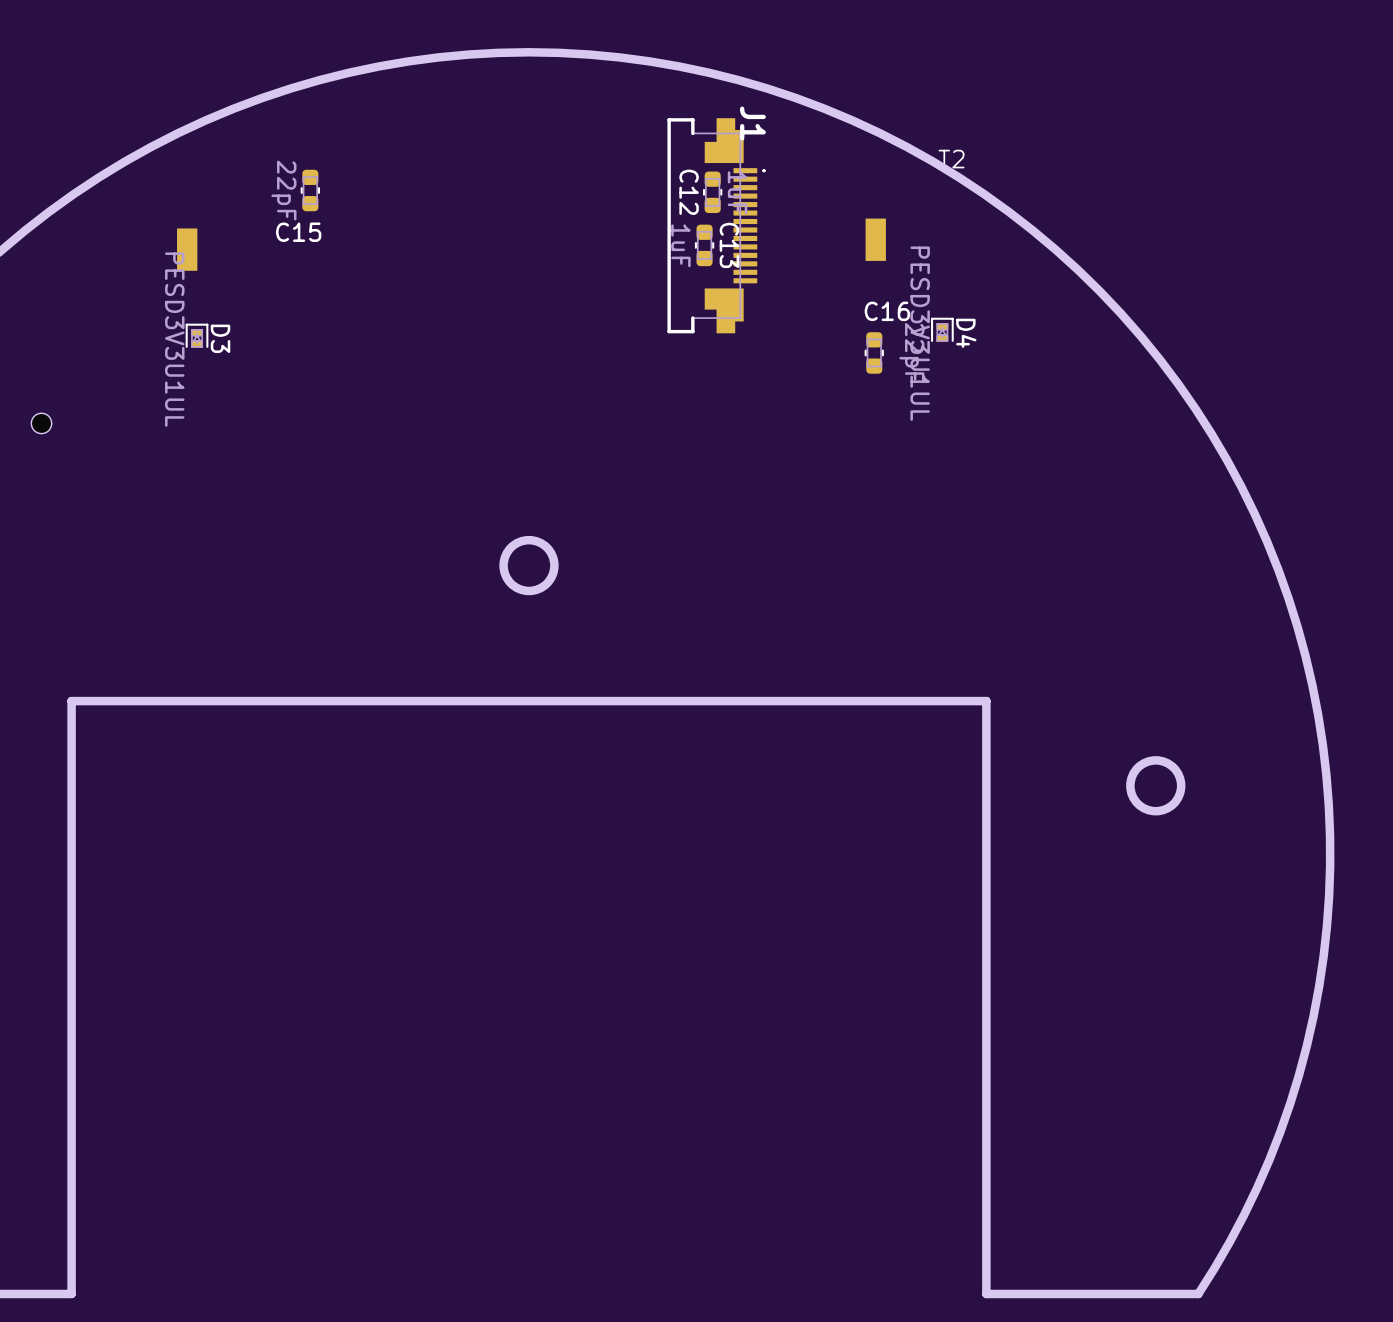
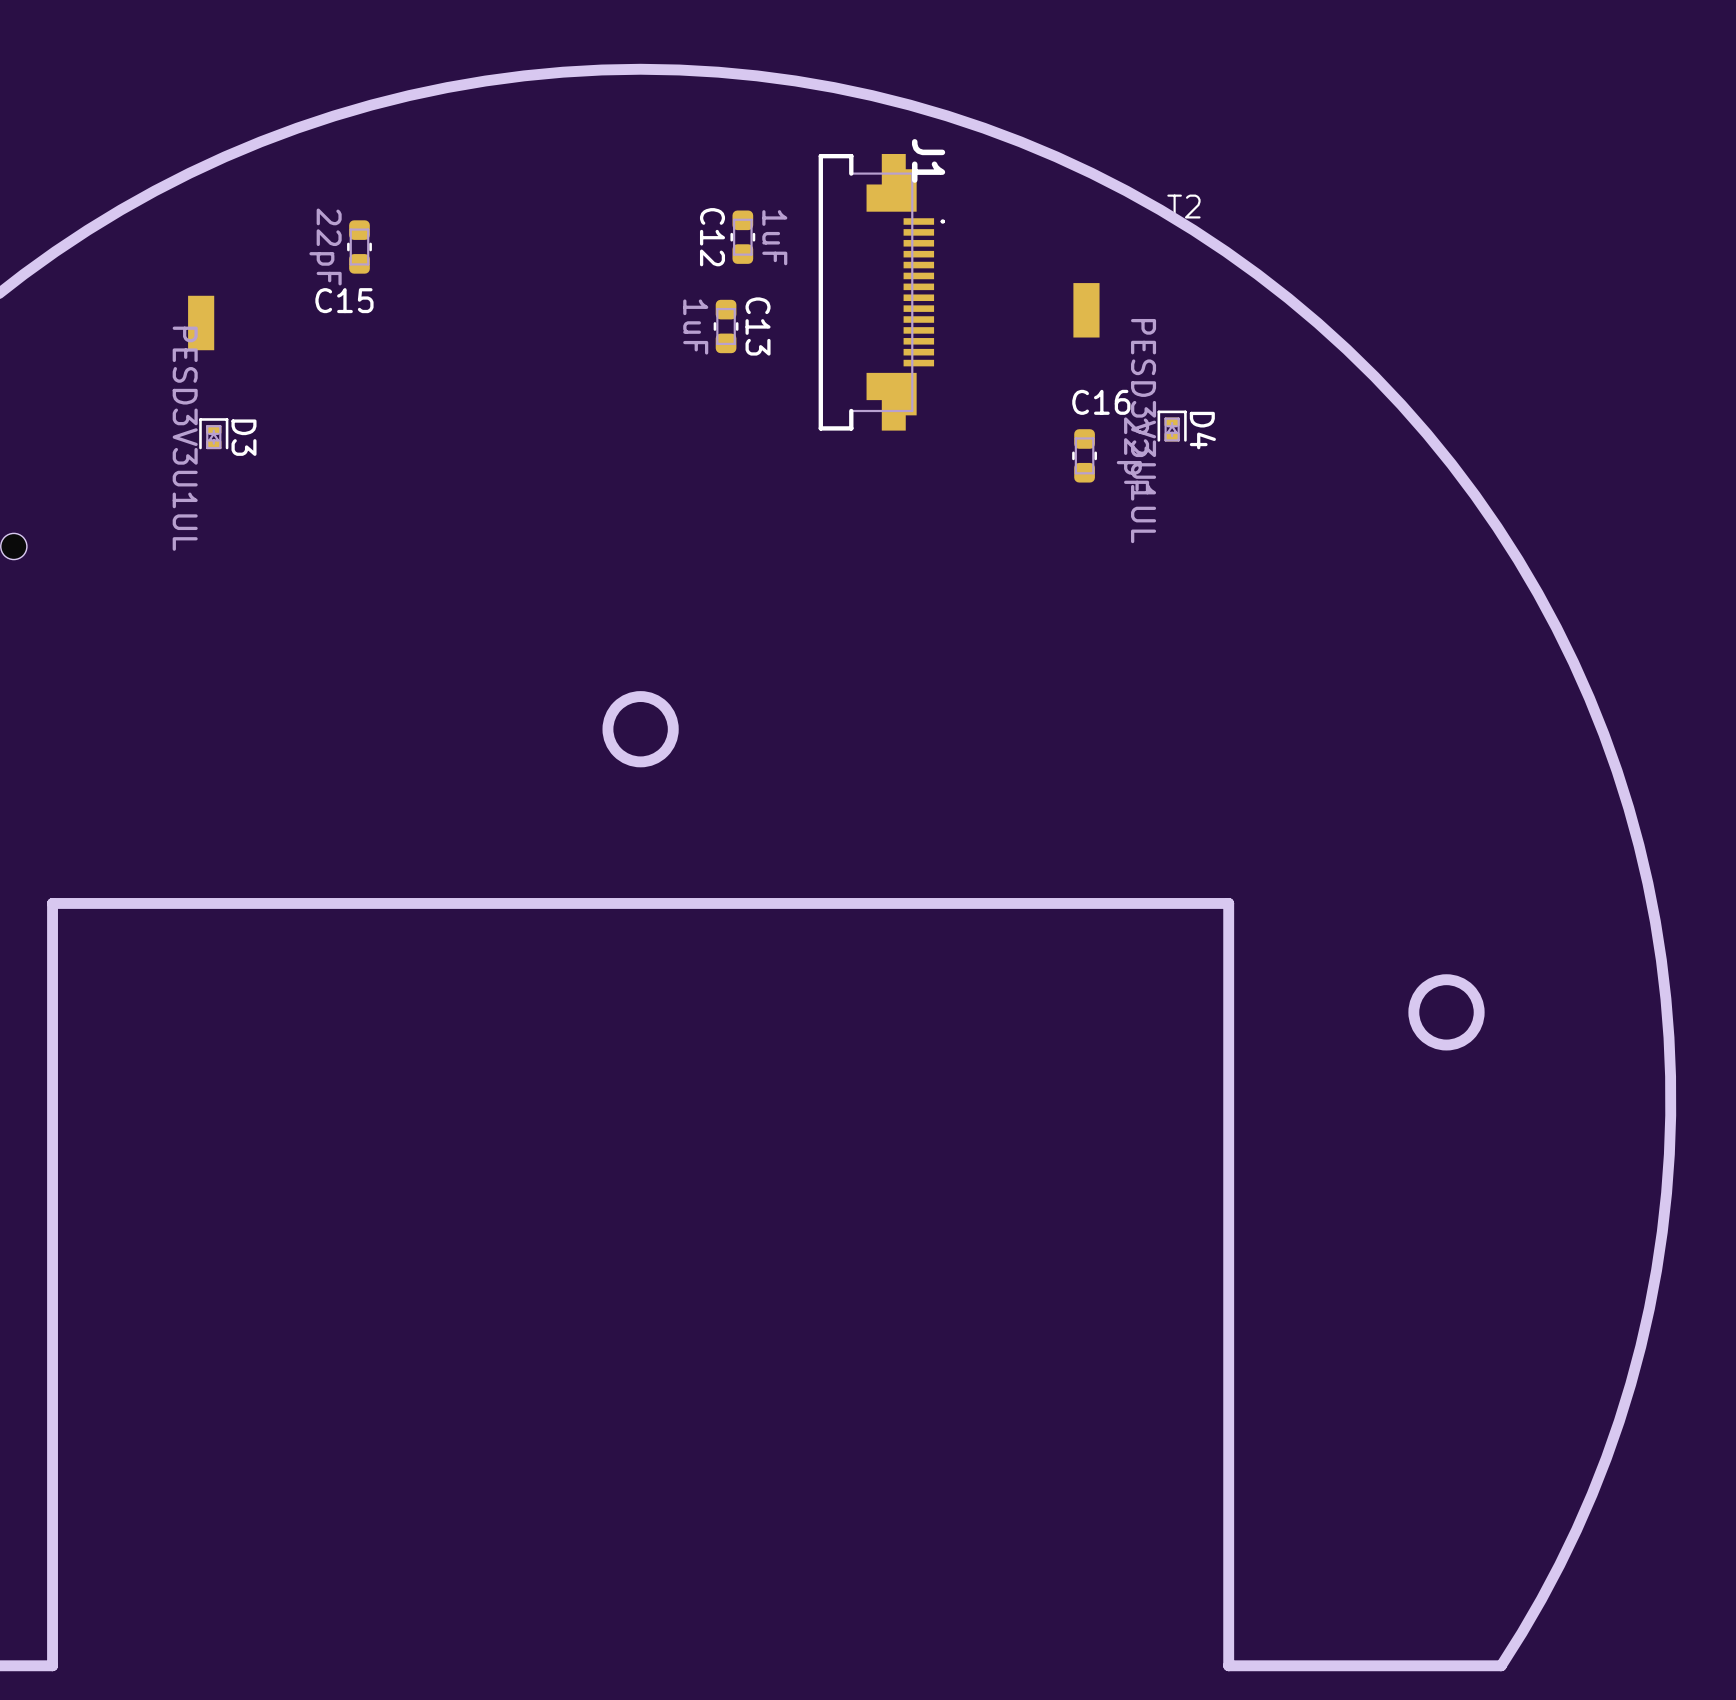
C12 position: (712, 192) -> (742, 237)
C13 position: (704, 245) -> (726, 326)

